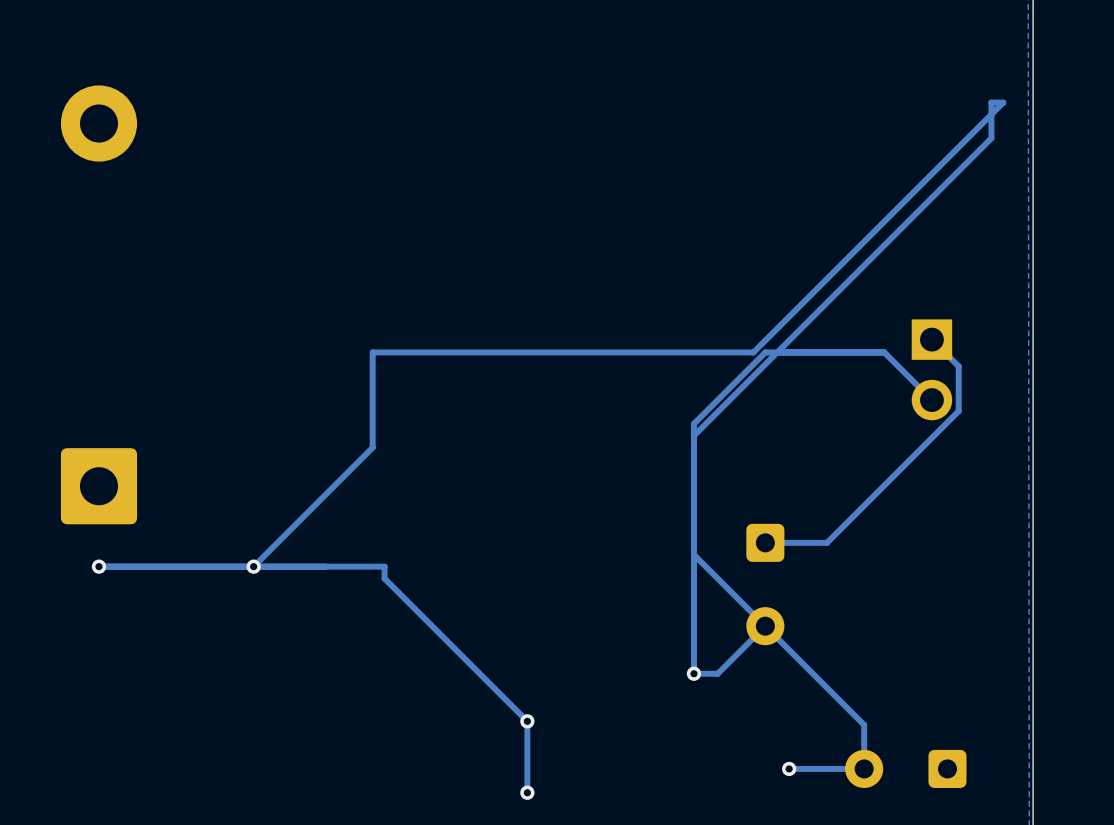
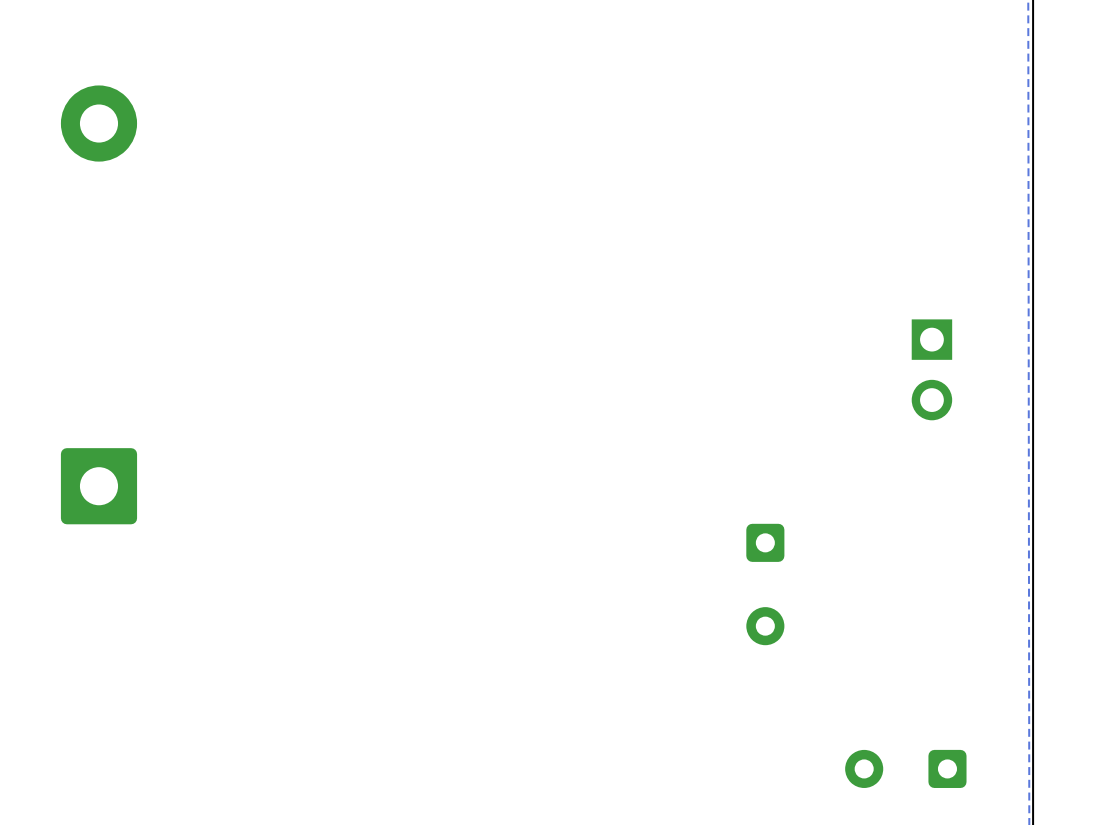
track: (931, 339) (958, 366) (958, 411) (827, 542) (765, 542) -> none
track: (931, 400) (884, 352) (765, 352) (693, 423) (693, 673) (717, 673) (765, 626) -> none
track: (693, 435) (991, 138) (991, 102) (1003, 102) (753, 352) (372, 352) (372, 447) (253, 566) -> none
track: (693, 554) (864, 724) (864, 768) (789, 768) -> none
track: (98, 566) (384, 566) (384, 578) (527, 721) (527, 792) -> none
via: (98, 566) -> none
via: (253, 566) -> none
via: (693, 673) -> none
via: (527, 721) -> none
via: (789, 768) -> none
via: (527, 792) -> none

